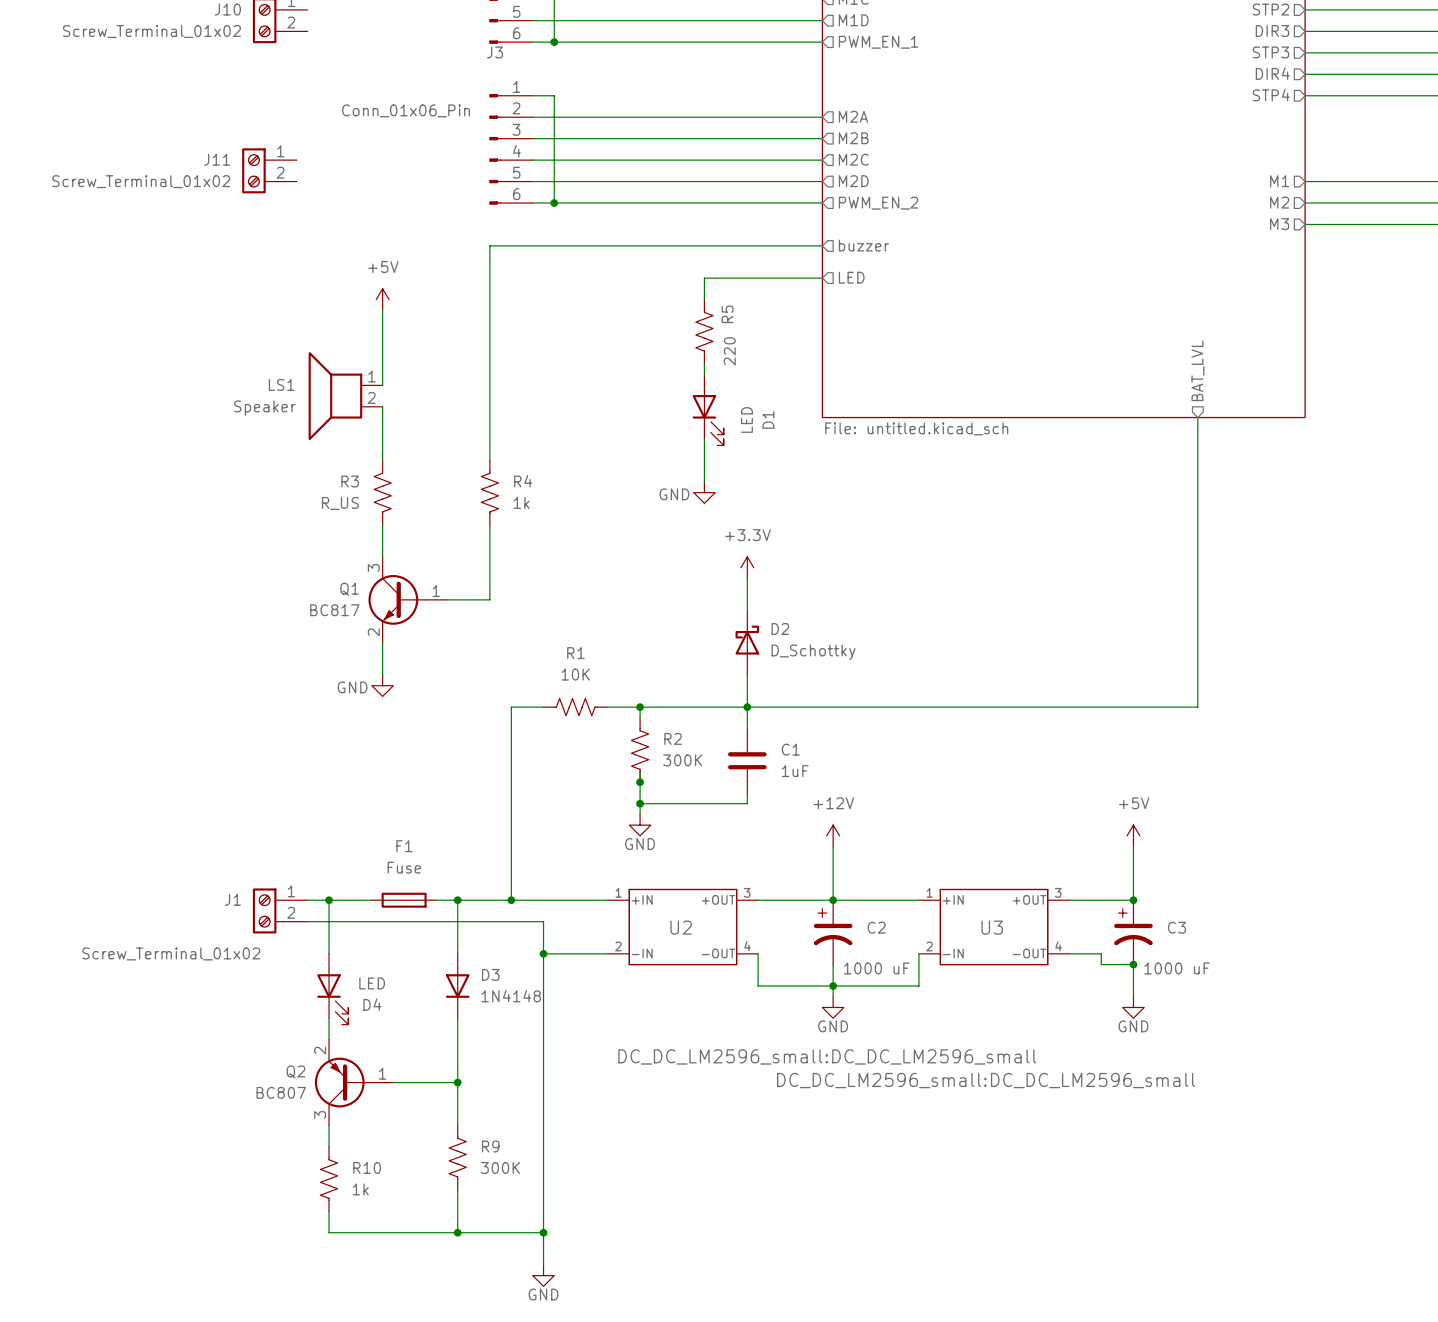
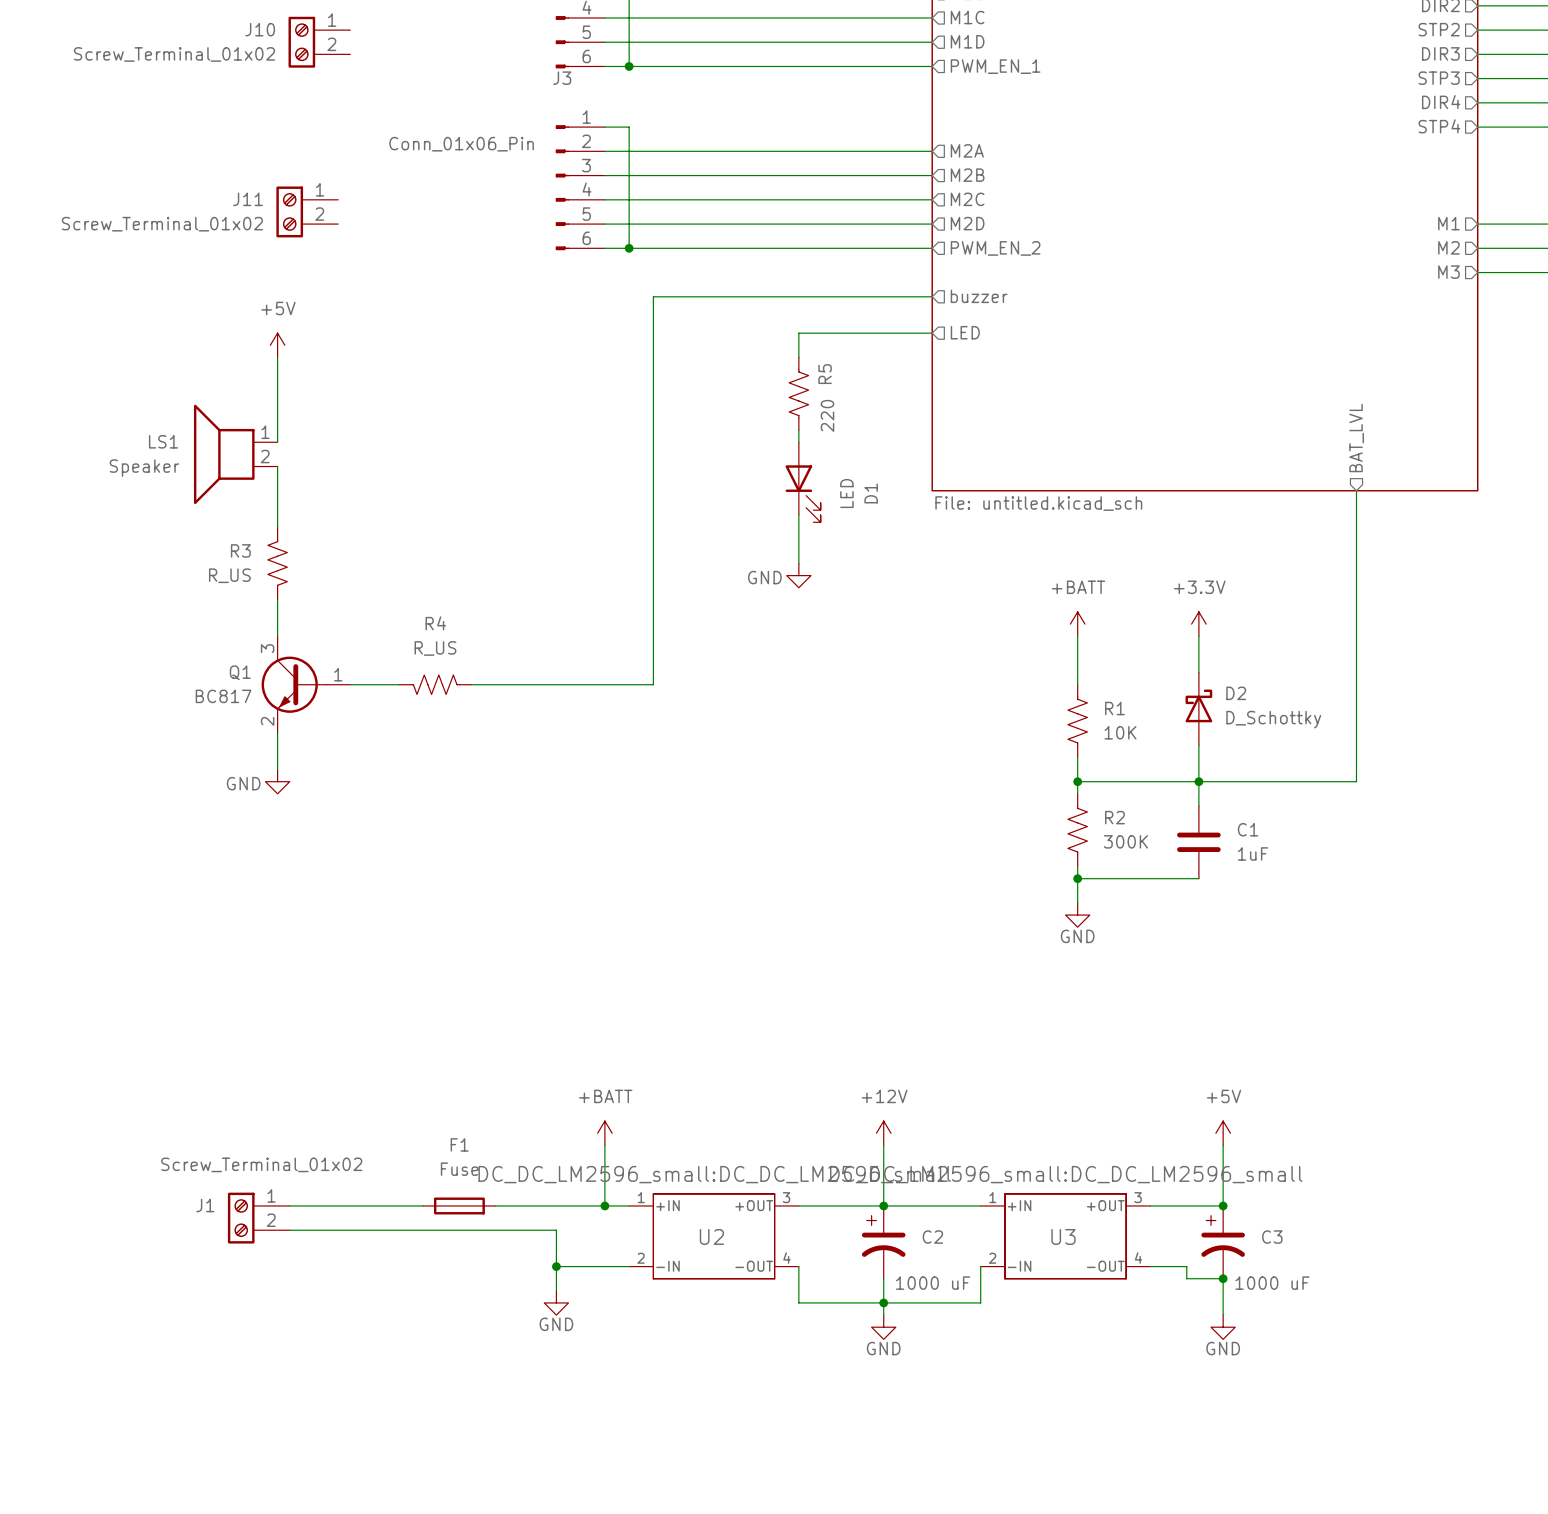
wire: (575, 245) (489, 245) (489, 460) -> (653, 296) (653, 684) (471, 684)
power symbol position: +5V (382, 299) -> +5V (277, 345)
wire: (382, 310) (382, 385) -> (277, 357) (277, 442)
LS1 position: (345, 396) -> (235, 454)
wire: (382, 406) (382, 460) -> (277, 466) (277, 527)
R4 name position: R4 (523, 481) -> R4 (435, 623)
R3 position: (382, 492) -> (277, 563)
R4 rotation: 0° (489, 492) -> 90° clockwise (435, 684)
R4 position: (489, 492) -> (435, 684)
R4 value: 1k (521, 502) -> R_US (435, 648)
wire: (382, 524) (382, 556) -> (277, 599) (277, 636)
wire: (489, 524) (489, 599) (447, 599) -> none
power symbol: none -> +BATT (1077, 624)
power symbol: none -> +3.3V (1198, 624)
wire: none -> (1077, 636) (1077, 684)
wire: none -> (1198, 636) (1198, 672)
power symbol: +3.3V (747, 567) -> none
wire: (747, 578) (747, 610) -> none
wire: none -> (350, 684) (398, 684)
Q1 position: (407, 599) -> (305, 684)
wire: (382, 642) (382, 674) -> (277, 733) (277, 769)
D2 position: (747, 642) -> (1198, 708)
wire: none -> (1198, 745) (1198, 805)
R1 name position: R1 (575, 653) -> R1 (1115, 708)
wire: none -> (1077, 757) (1077, 793)
wire: (747, 674) (747, 728) -> none
junction: none -> (1077, 781)
junction: none -> (1198, 781)
wire: (1197, 674) (1197, 707) (607, 707) -> (1356, 781) (1077, 781)
power symbol position: GND (382, 685) -> GND (277, 781)
wire: (543, 707) (511, 707) (511, 900) -> none
R1 rotation: 0° (575, 707) -> 90° clockwise (1077, 721)
R1 position: (575, 707) -> (1077, 721)
wire: (640, 707) (640, 717) -> none
junction: (640, 707) -> none
junction: (747, 707) -> none
R2 position: (640, 750) -> (1077, 830)
wire: none -> (1077, 866) (1077, 902)
C1 position: (747, 760) -> (1198, 842)
wire: none -> (1077, 878) (1198, 878)
junction: none -> (1077, 878)
wire: (640, 771) (640, 814) -> none
junction: (640, 782) -> none
wire: (747, 792) (747, 803) (640, 803) -> none
power symbol: none -> GND (1077, 915)
junction: (640, 803) -> none
power symbol: GND (640, 825) -> none
power symbol position: +12V (833, 835) -> +12V (883, 1133)
power symbol position: +5V (1133, 835) -> +5V (1223, 1133)
wire: (833, 846) (833, 900) -> (883, 1145) (883, 1205)
wire: (1133, 846) (1133, 900) (1069, 900) -> (1223, 1145) (1223, 1205) (1150, 1205)
wire: (307, 900) (371, 900) -> none
wire: (329, 900) (329, 953) -> none
junction: (329, 900) -> none
F1 position: (404, 900) -> (459, 1205)
wire: (436, 900) (607, 900) -> none
wire: (457, 900) (457, 953) -> (604, 1145) (604, 1205)
junction: (457, 900) -> none
junction: (511, 900) -> none
wire: (758, 900) (918, 900) -> (798, 1205) (980, 1205)
junction: (833, 900) -> none
junction: (1133, 900) -> none
J1 position: (280, 910) -> (258, 1218)
wire: (307, 921) (543, 921) (543, 1264) -> none
U2 position: (682, 927) -> (714, 1236)
U3 position: (994, 927) -> (1065, 1236)
C2 position: (833, 932) -> (883, 1242)
C3 position: (1133, 932) -> (1223, 1242)
J1 value position: Screw_Terminal_01x02 (171, 953) -> Screw_Terminal_01x02 (261, 1164)
wire: (543, 953) (607, 953) -> (556, 1266) (629, 1266)
junction: (543, 953) -> none
wire: (758, 953) (758, 986) (918, 986) (918, 953) -> (798, 1266) (798, 1302) (980, 1302) (980, 1266)
wire: (1069, 953) (1101, 953) (1101, 964) (1133, 964) (1133, 996) -> (1150, 1266) (1186, 1266) (1186, 1278) (1223, 1278) (1223, 1315)
wire: (833, 964) (833, 996) -> (883, 1278) (883, 1315)
junction: (1133, 964) -> none
D3: 1N4148 (457, 986) -> none
power symbol: none -> +BATT (604, 1133)
junction: (833, 986) -> none
D4: LED (332, 989) -> none
power symbol: GND (833, 1007) -> none
power symbol: GND (1133, 1007) -> none
wire: (329, 1018) (329, 1039) -> none
wire: (457, 1018) (457, 1125) -> none
wire: none -> (289, 1205) (423, 1205)
wire: none -> (495, 1205) (629, 1205)
junction: none -> (604, 1205)
junction: none -> (883, 1205)
junction: none -> (1223, 1205)
U2 text position: DC_DC_LM2596_small:DC_DC_LM2596_small (827, 1056) -> DC_DC_LM2596_small:DC_DC_LM2596_small (714, 1174)
wire: none -> (289, 1230) (556, 1230) (556, 1290)
U3 text position: DC_DC_LM2596_small:DC_DC_LM2596_small (986, 1080) -> DC_DC_LM2596_small:DC_DC_LM2596_small (1066, 1174)
Q2: BC807 (354, 1082) -> none
wire: (393, 1082) (457, 1082) -> none
junction position: (457, 1082) -> (556, 1266)
junction: none -> (1223, 1278)
wire: (329, 1125) (329, 1146) -> none
power symbol: none -> GND (556, 1302)
junction: none -> (883, 1302)
R9: 300K (457, 1157) -> none
power symbol: none -> GND (883, 1327)
power symbol: none -> GND (1223, 1327)
R10: 1k (329, 1179) -> none
wire: (457, 1189) (457, 1232) -> none
wire: (329, 1211) (329, 1232) (543, 1232) -> none
junction: (457, 1232) -> none
junction: (543, 1232) -> none
power symbol: GND (543, 1275) -> none

